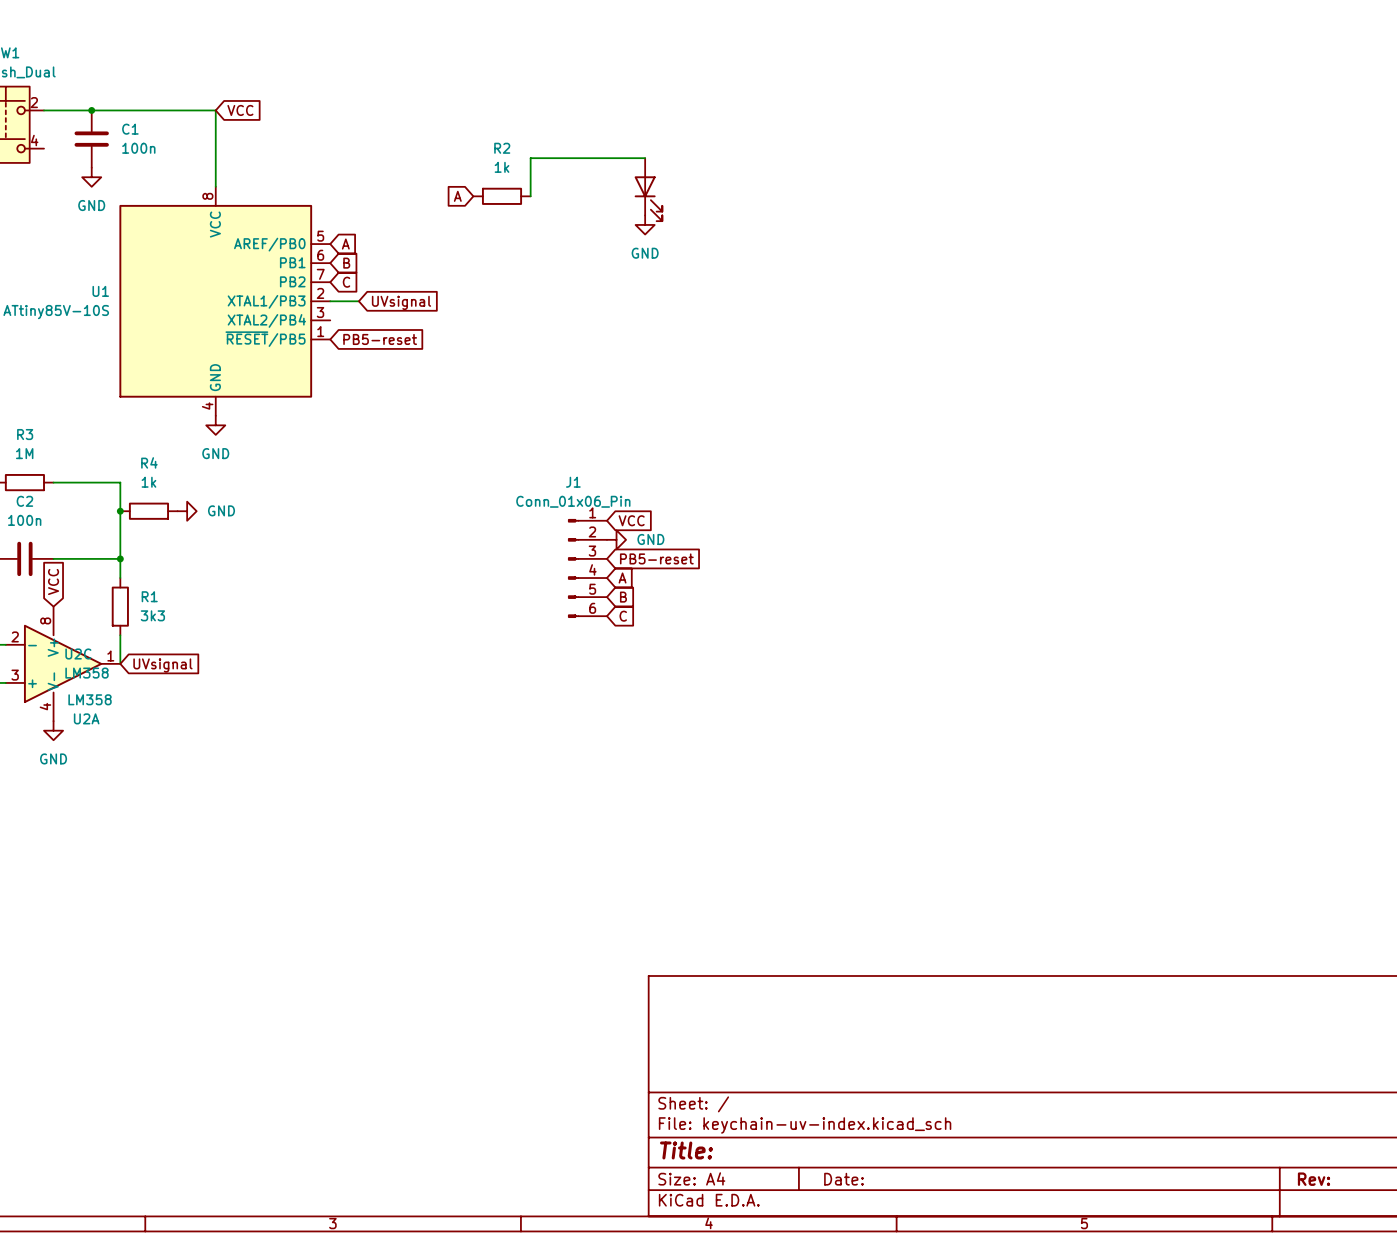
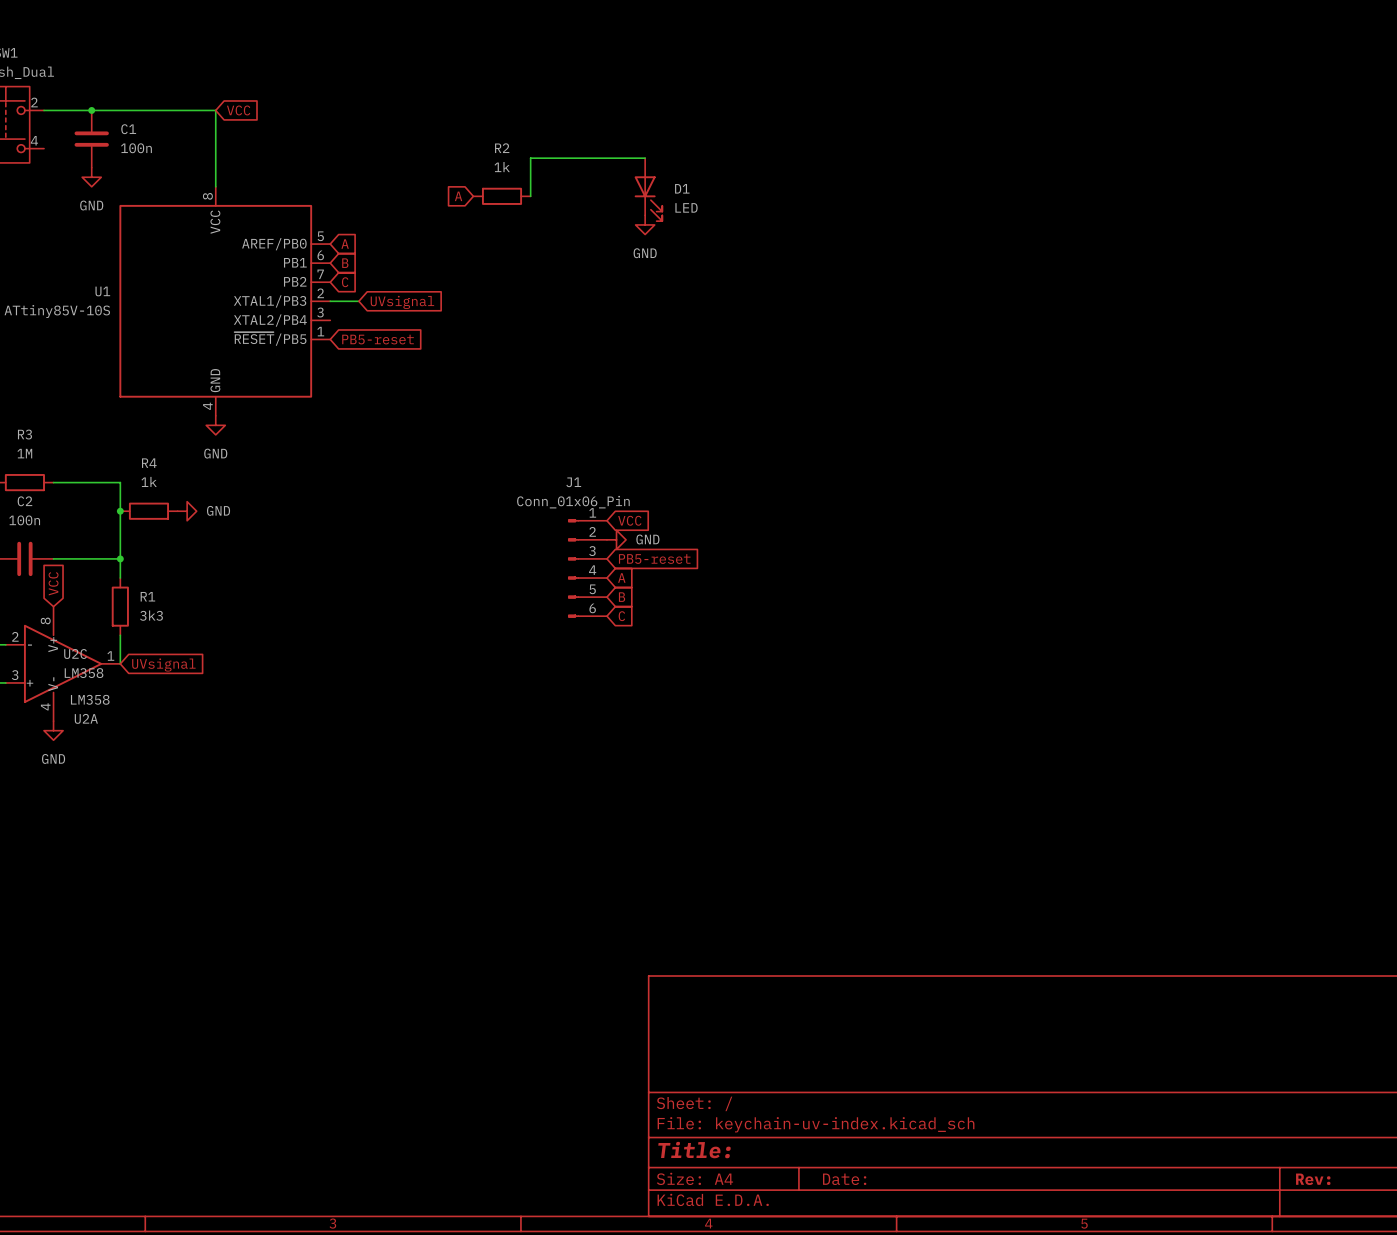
D1 name: none -> D1 (682, 188)
D1 value: none -> LED (686, 207)

